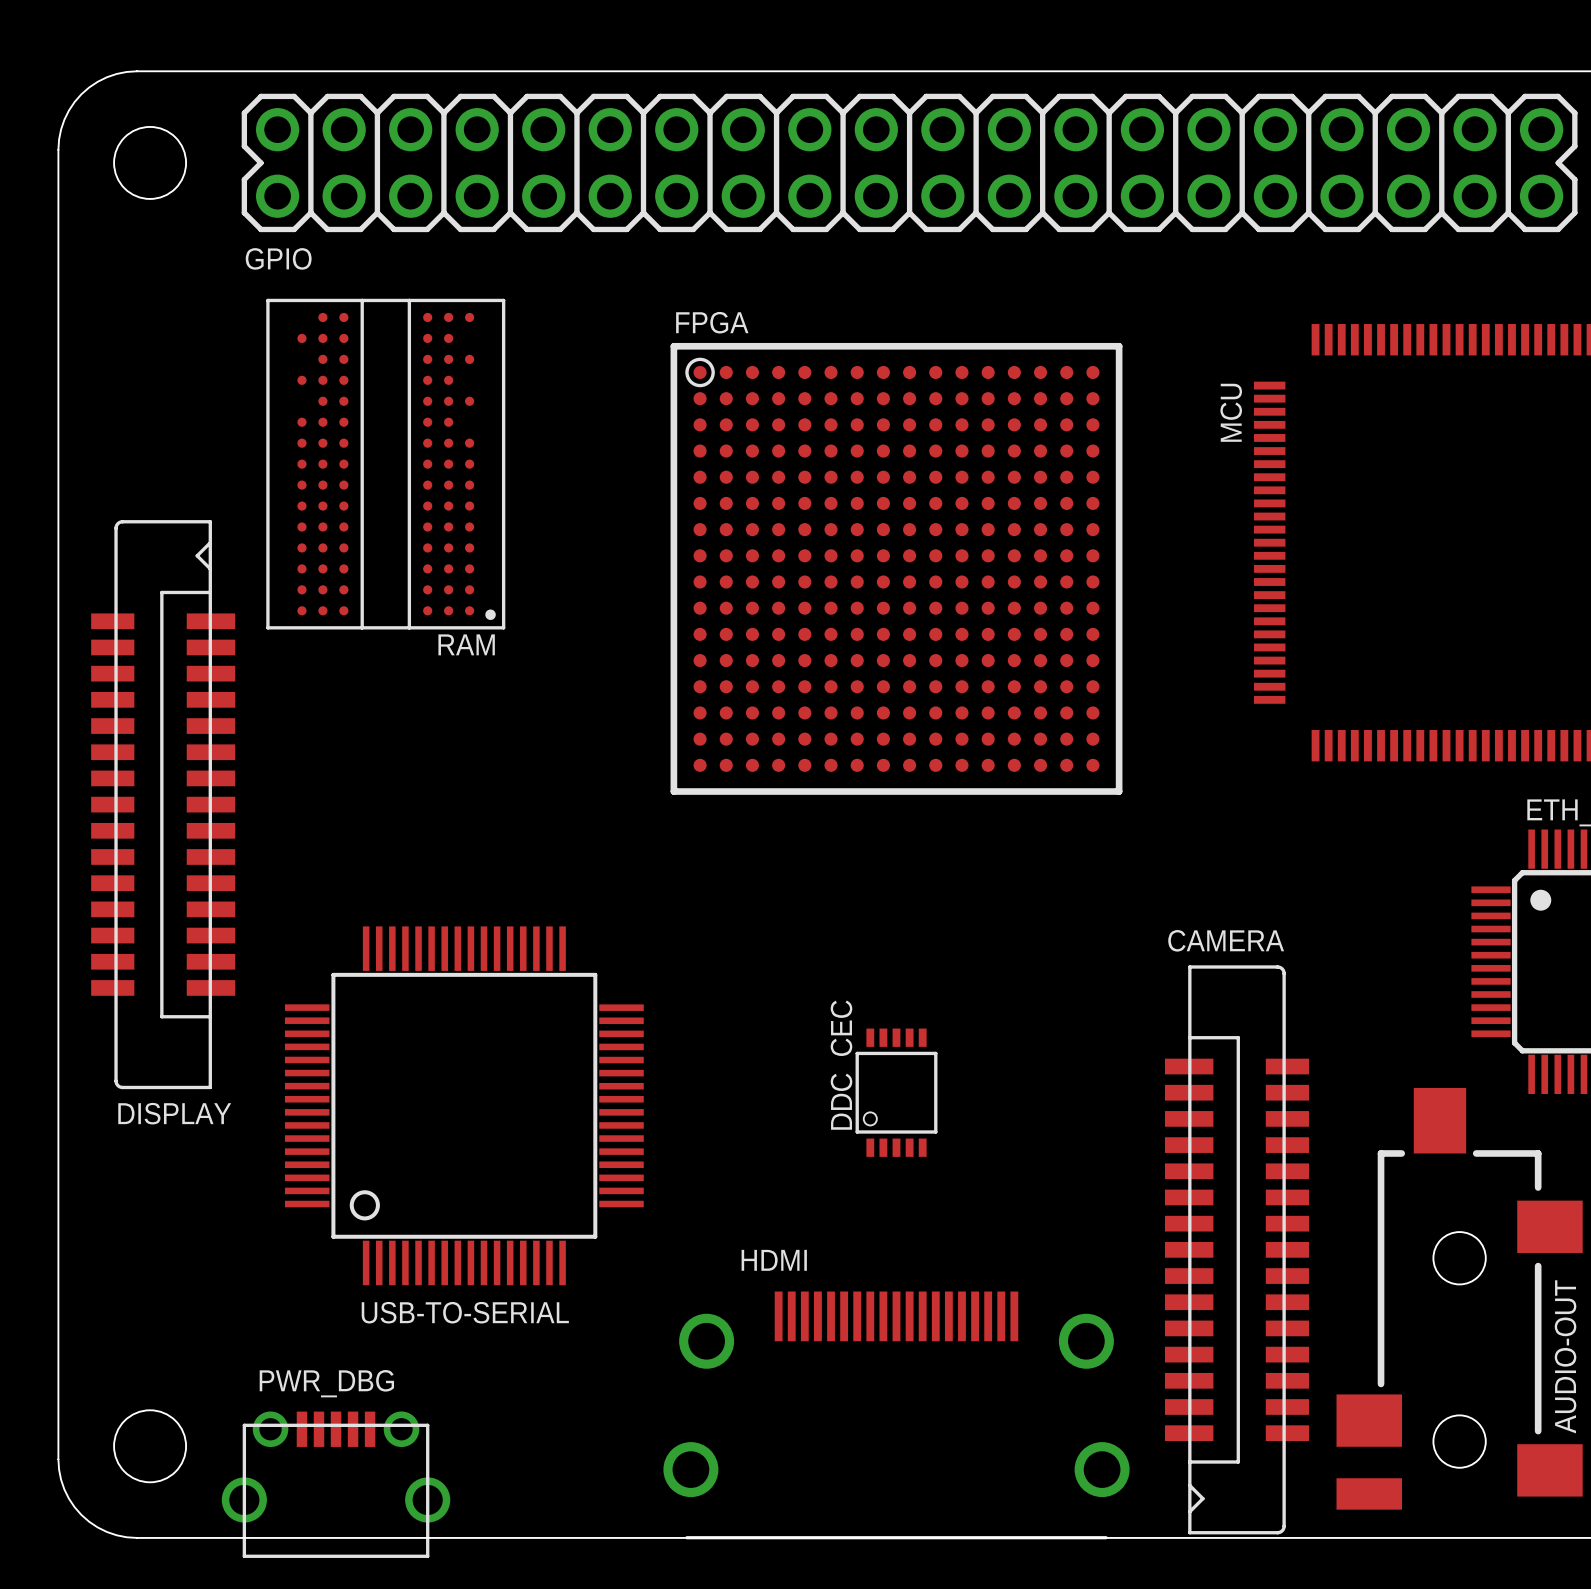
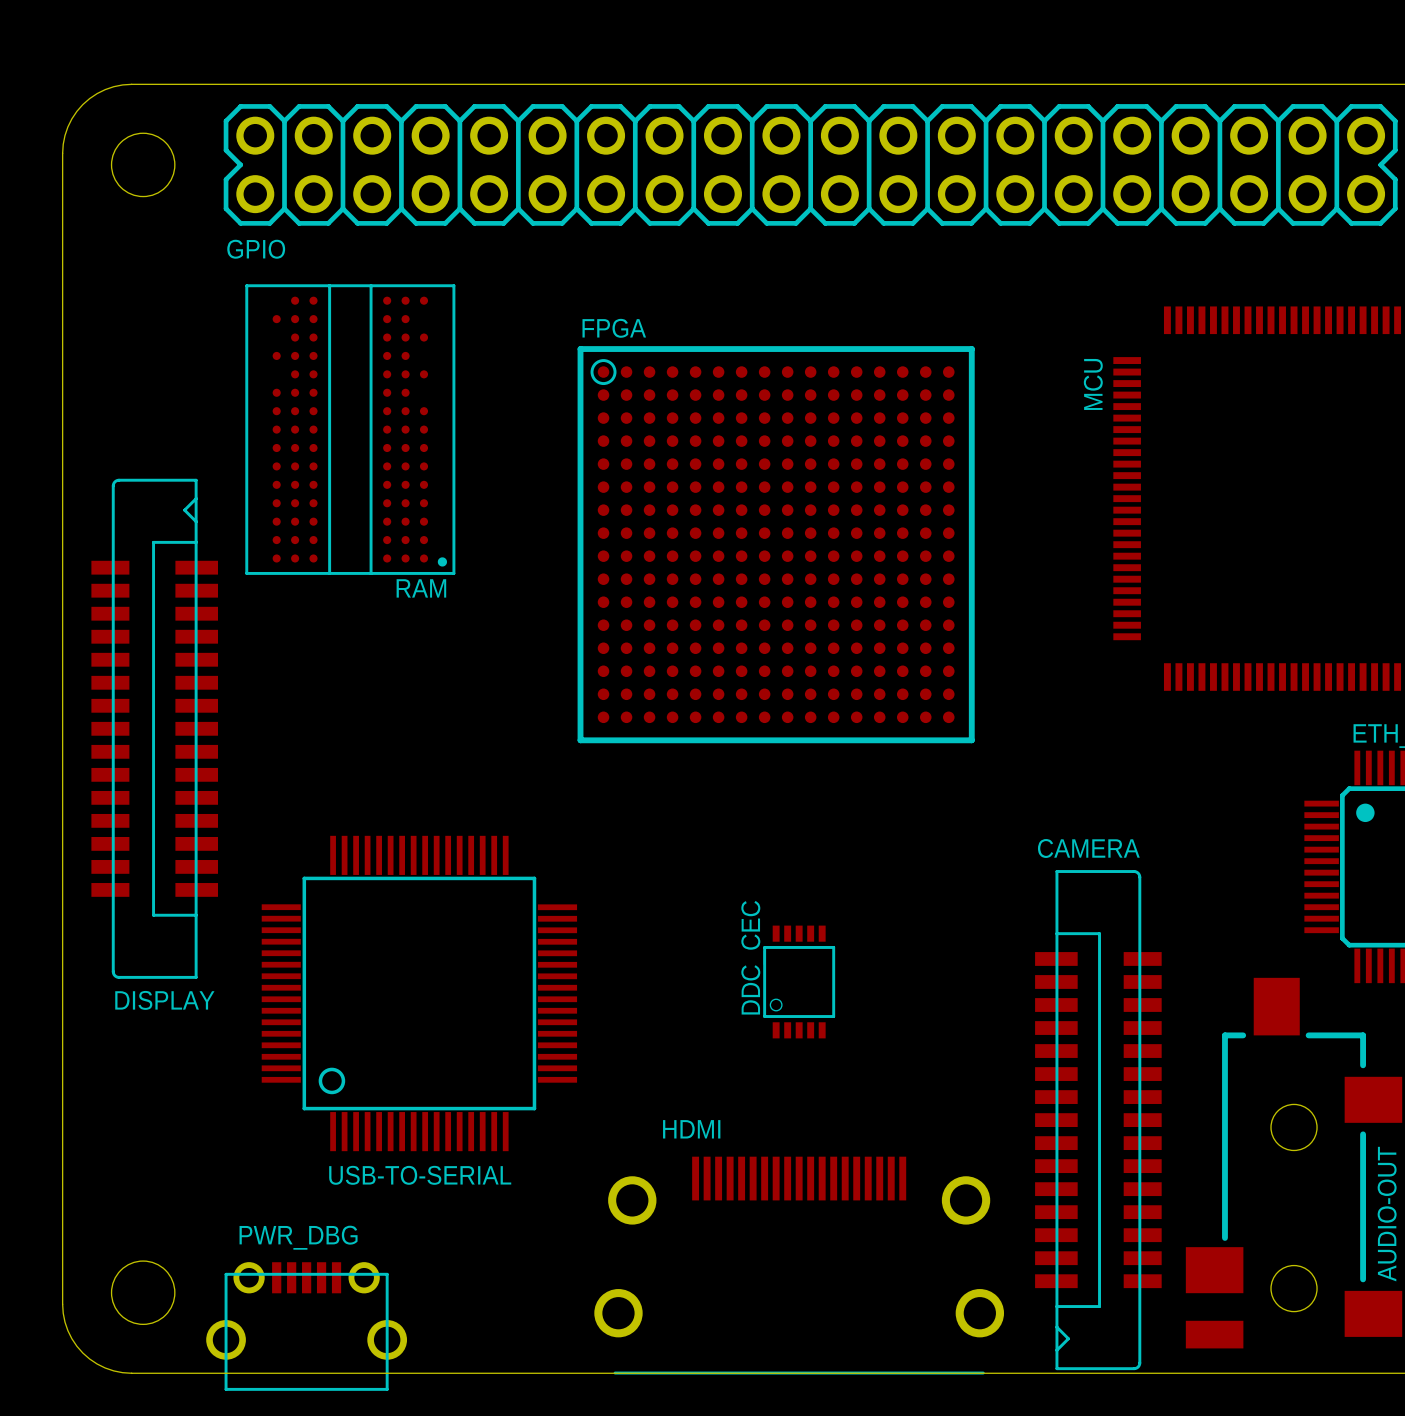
FPGA position: (896, 568) -> (776, 544)

